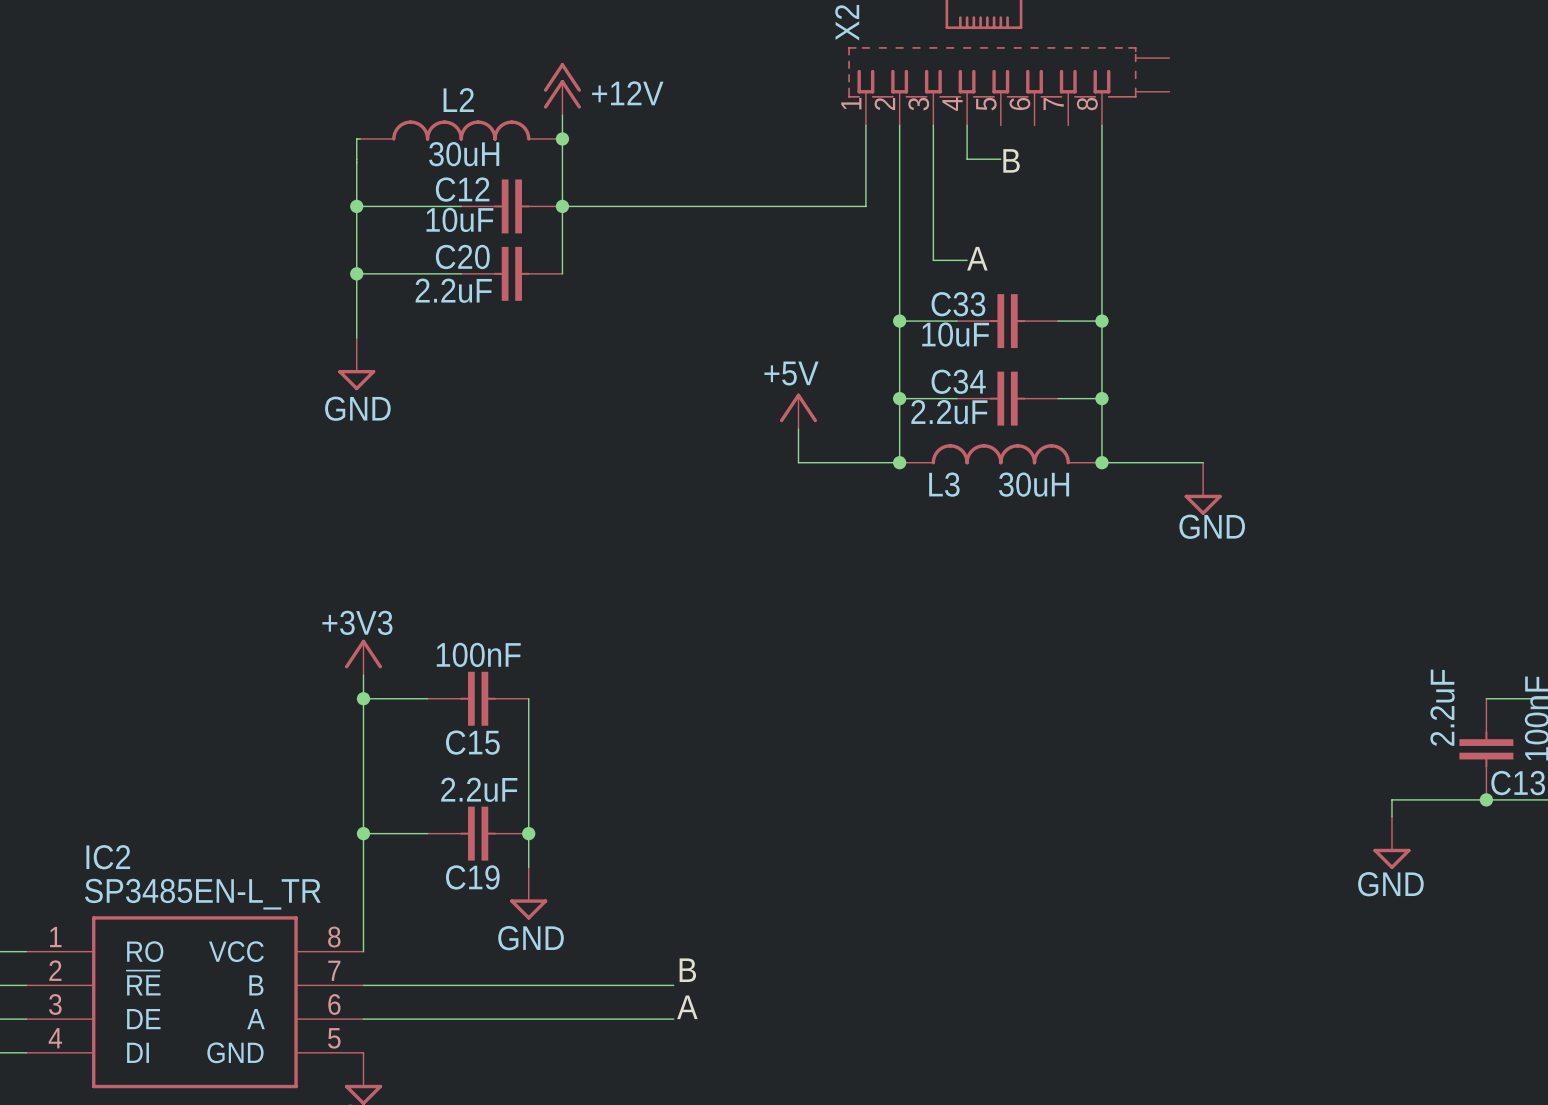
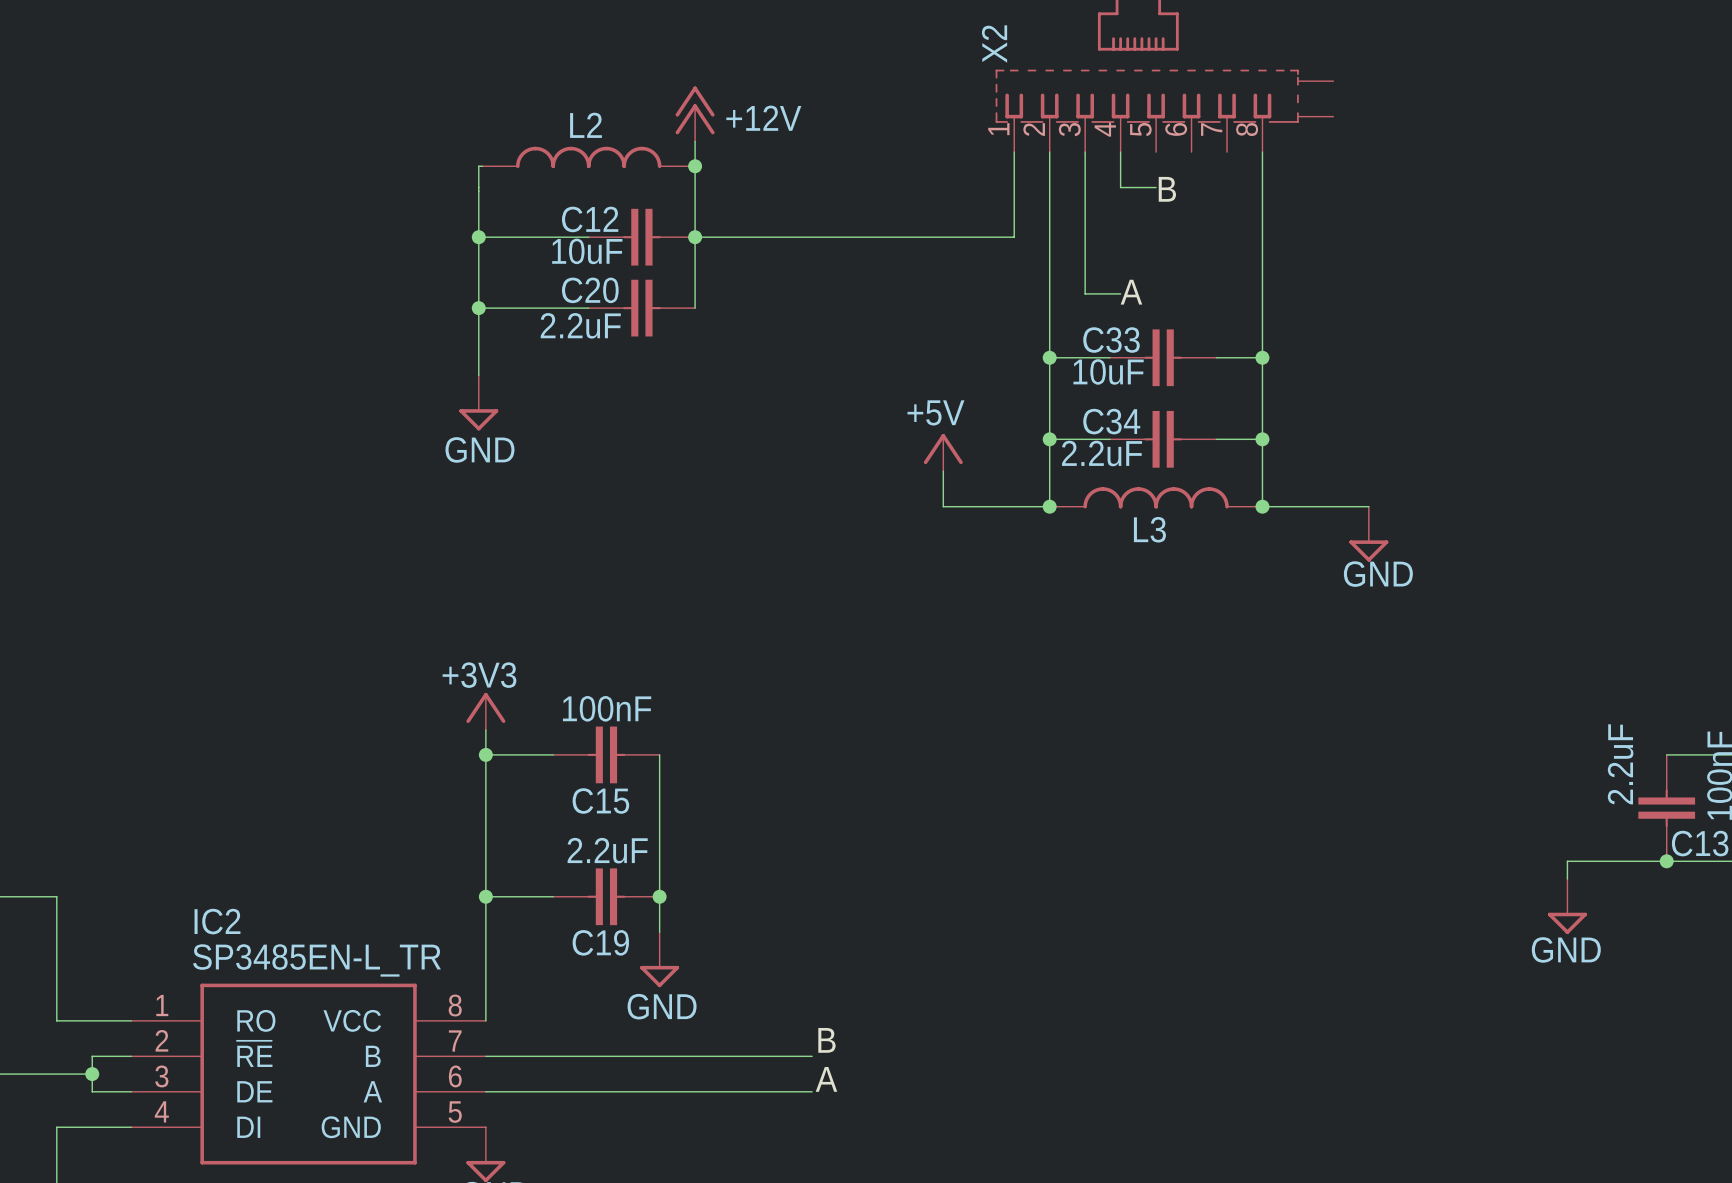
L2 value: 30uH (464, 154) -> none
L3 name position: L3 (944, 484) -> L3 (1149, 529)
L3 value: 30uH (1034, 484) -> none

